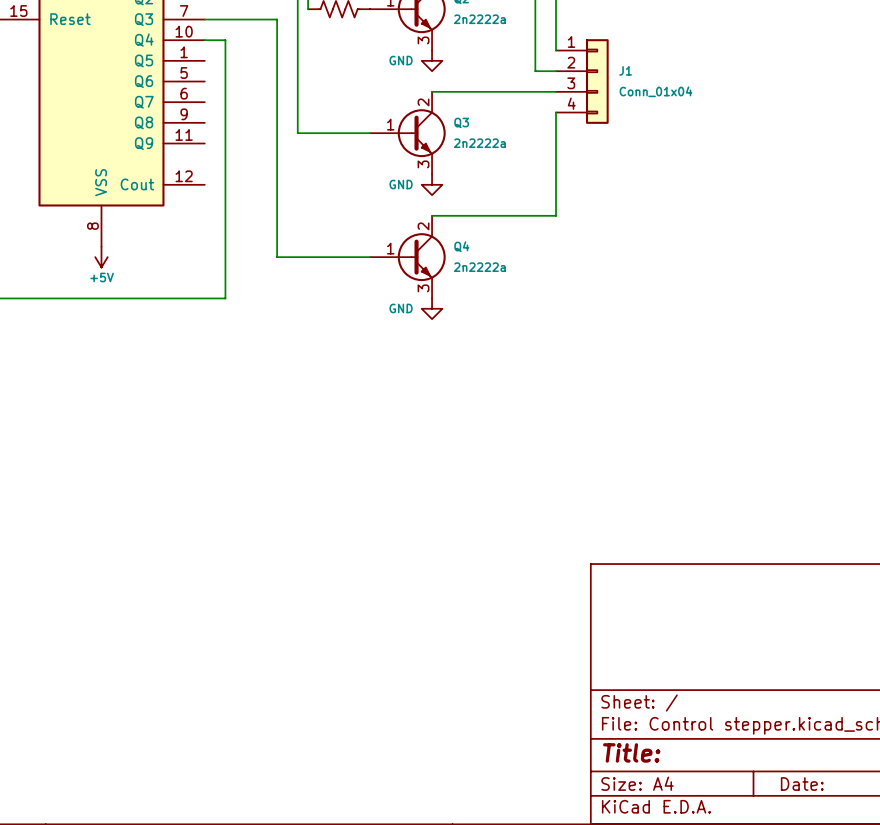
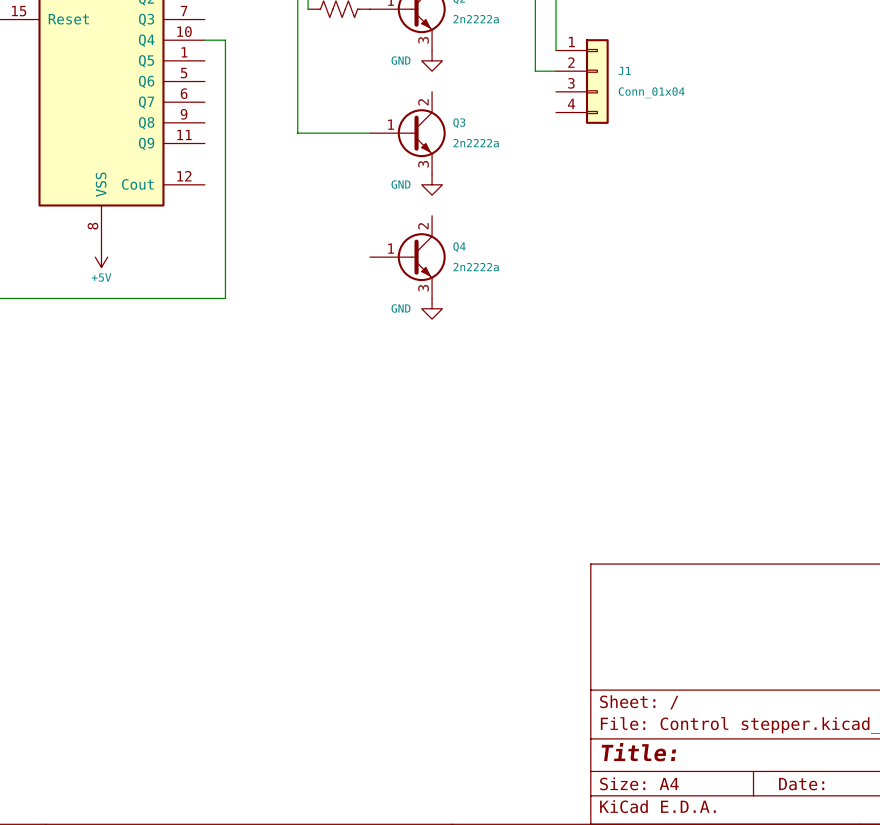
wire: (204, 19) (277, 19) (277, 257) (370, 257) -> none
wire: (432, 91) (556, 91) -> none
wire: (556, 112) (556, 215) (432, 215) -> none

